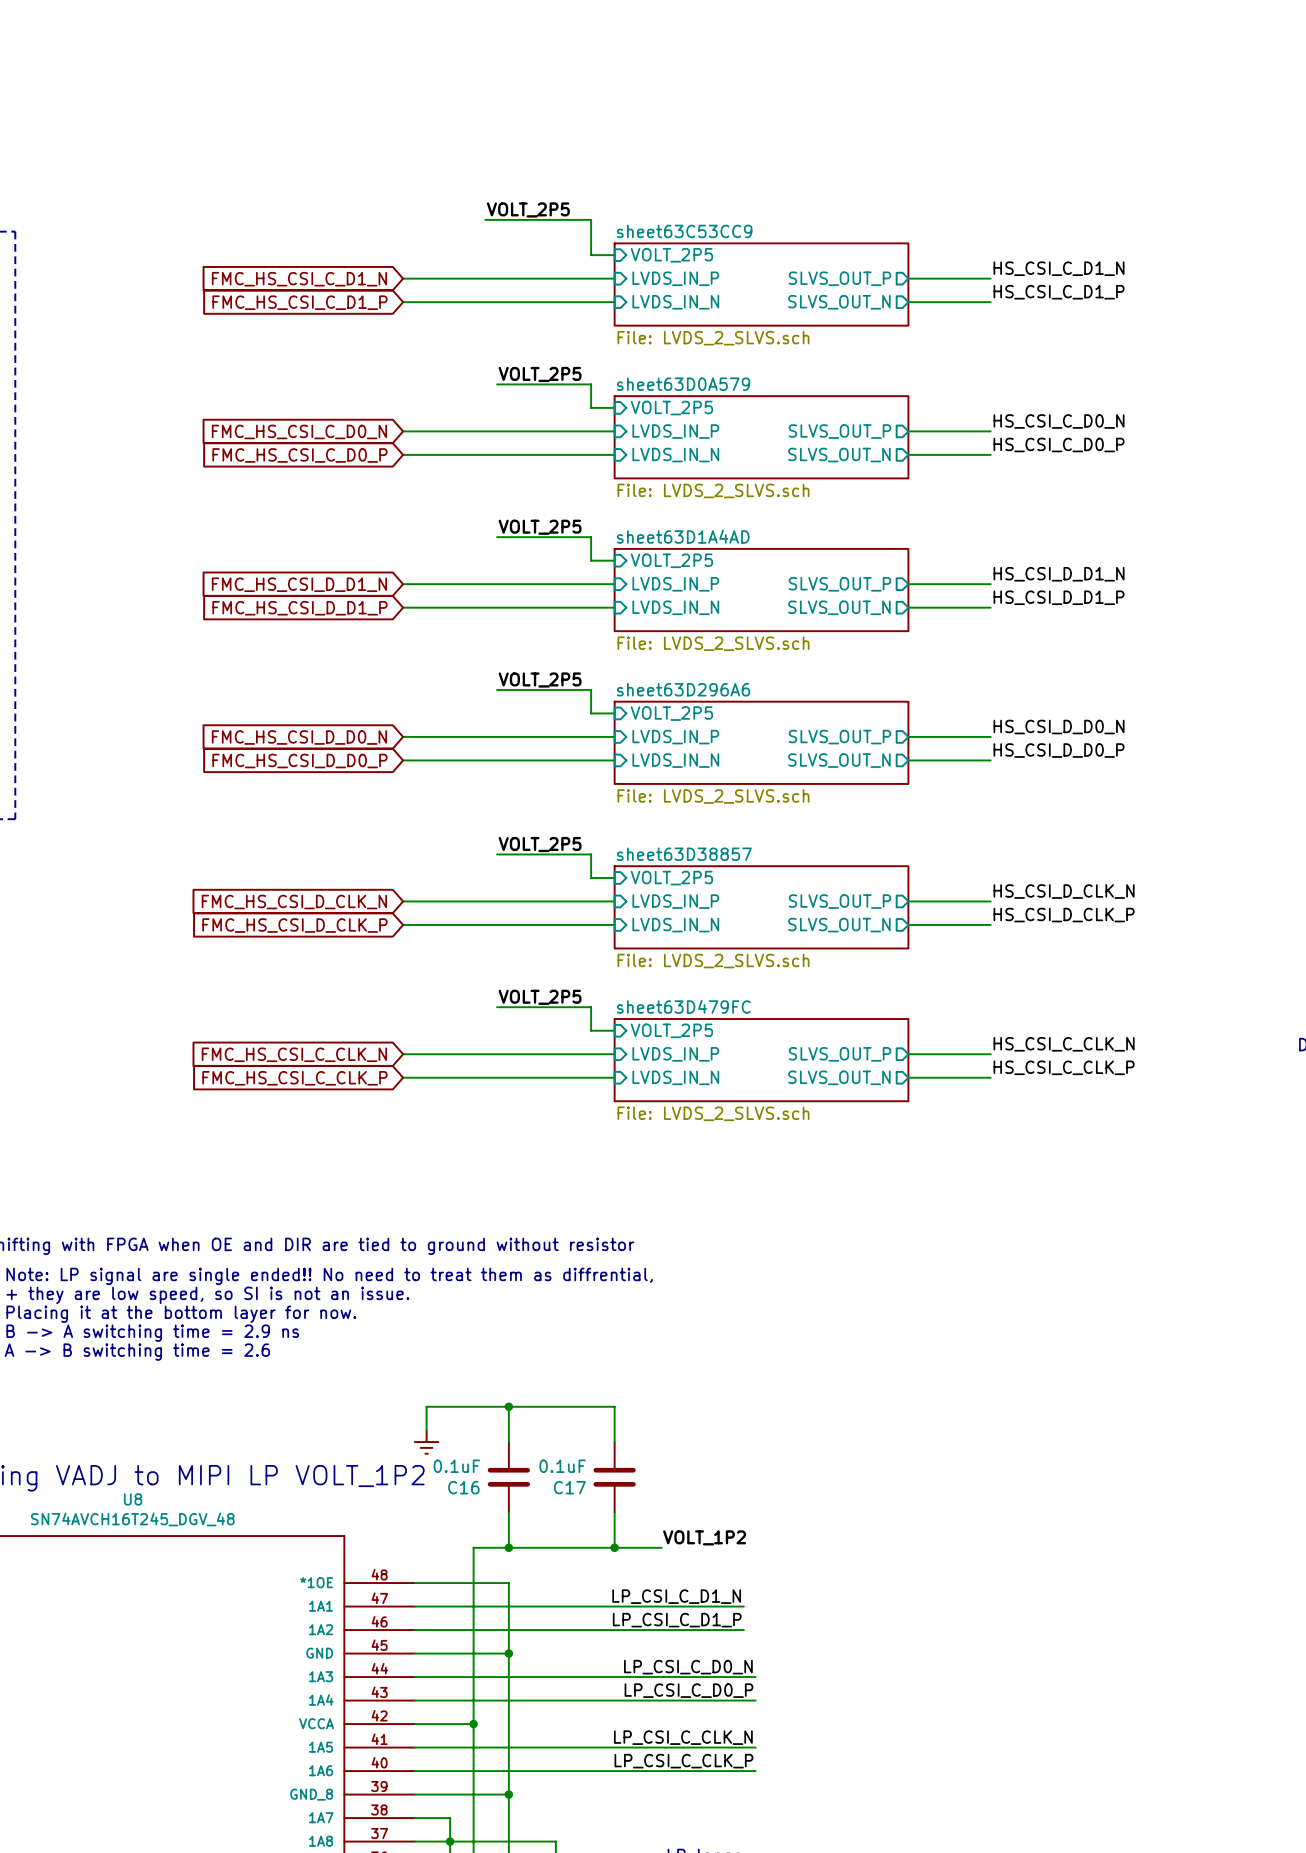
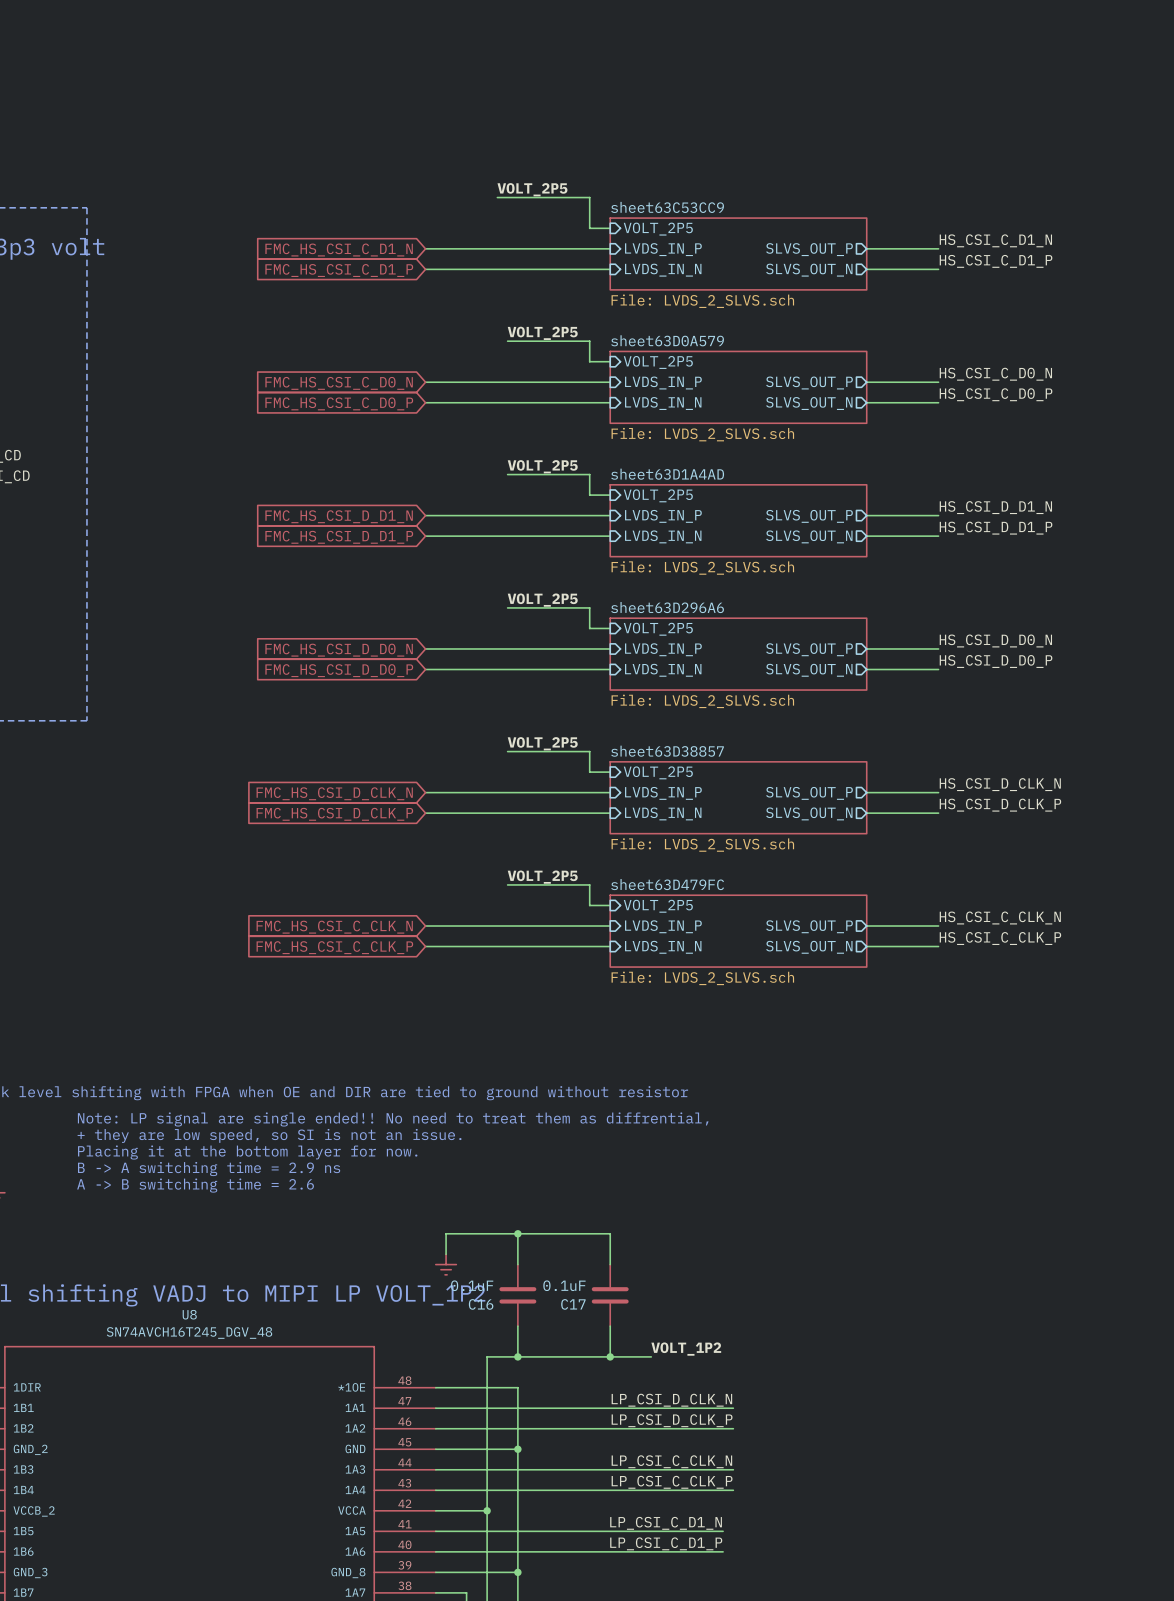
label position: LP_CSI_C_D1_N (676, 1596) -> LP_CSI_C_D1_N (666, 1523)
label: none -> LP_CSI_D_CLK_N (671, 1400)
label position: LP_CSI_C_D1_P (677, 1620) -> LP_CSI_C_D1_P (666, 1543)
label: none -> LP_CSI_D_CLK_P (672, 1420)
label: LP_CSI_C_D0_N (688, 1667) -> LP_CSI_C_CLK_N (671, 1461)
label: LP_CSI_C_D0_P (688, 1690) -> LP_CSI_C_CLK_P (672, 1482)
label: LP_CSI_C_CLK_N (683, 1737) -> none
wire: (743, 1747) (755, 1747) -> (723, 1428) (733, 1428)
label: LP_CSI_C_CLK_P (683, 1761) -> none
wire: (743, 1771) (755, 1771) -> (723, 1408) (733, 1408)

